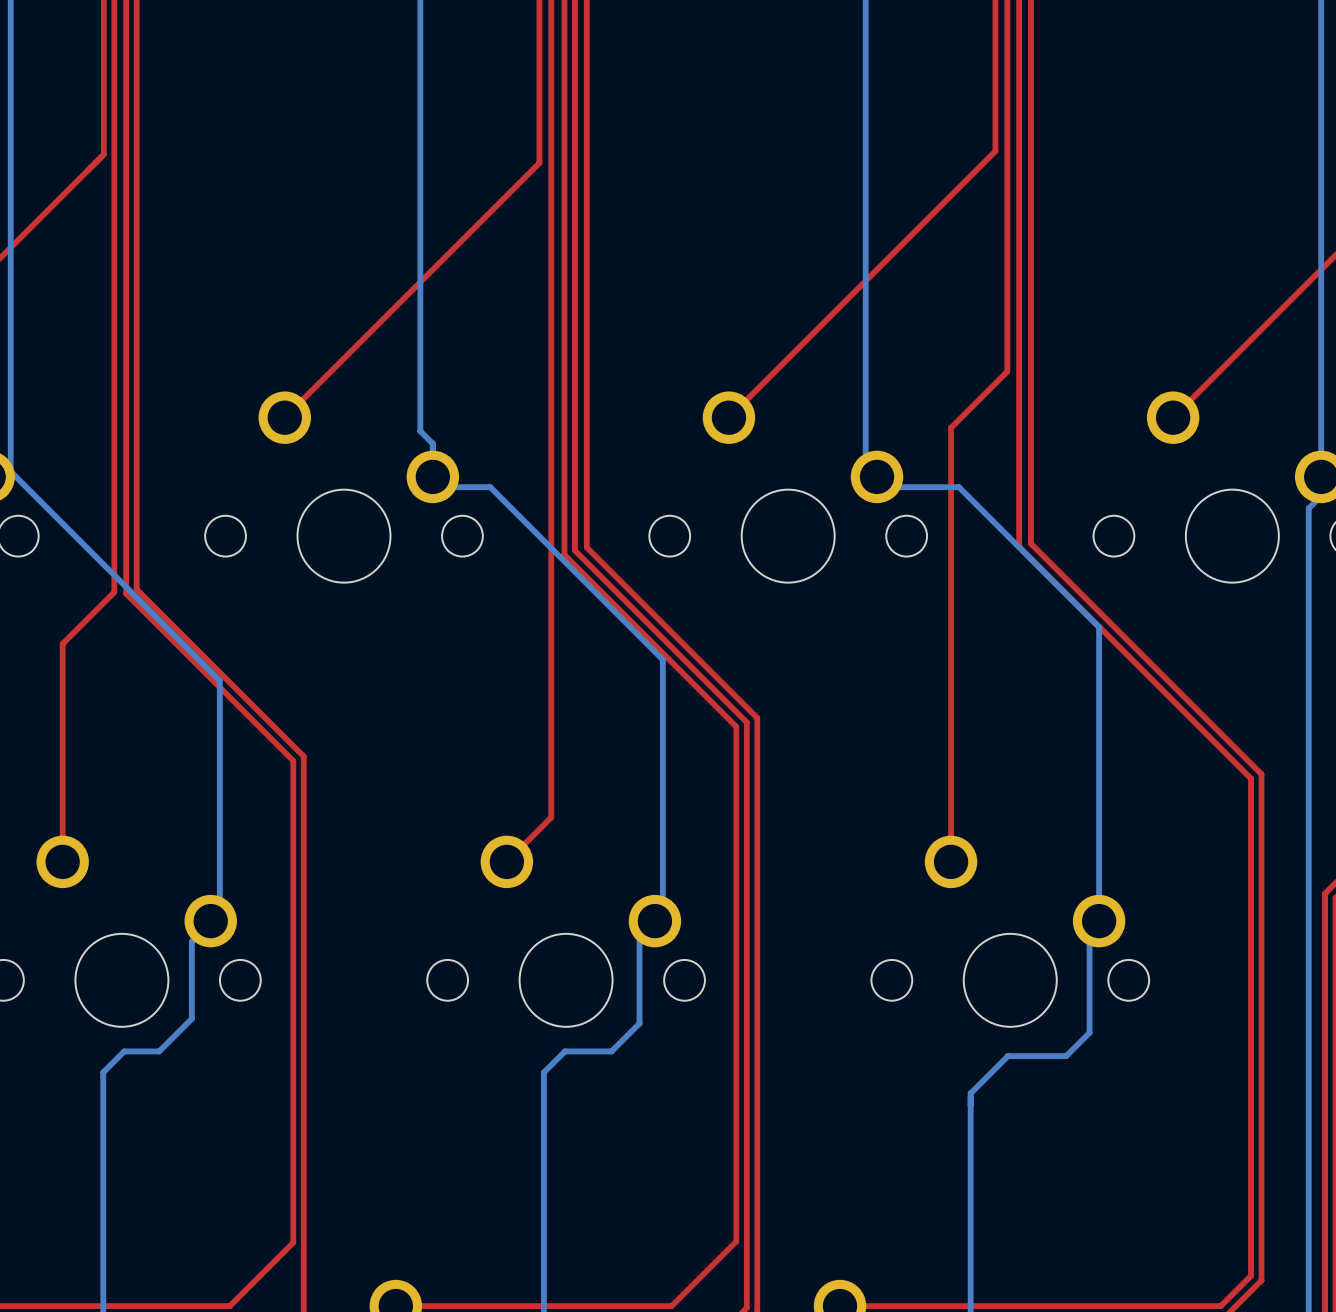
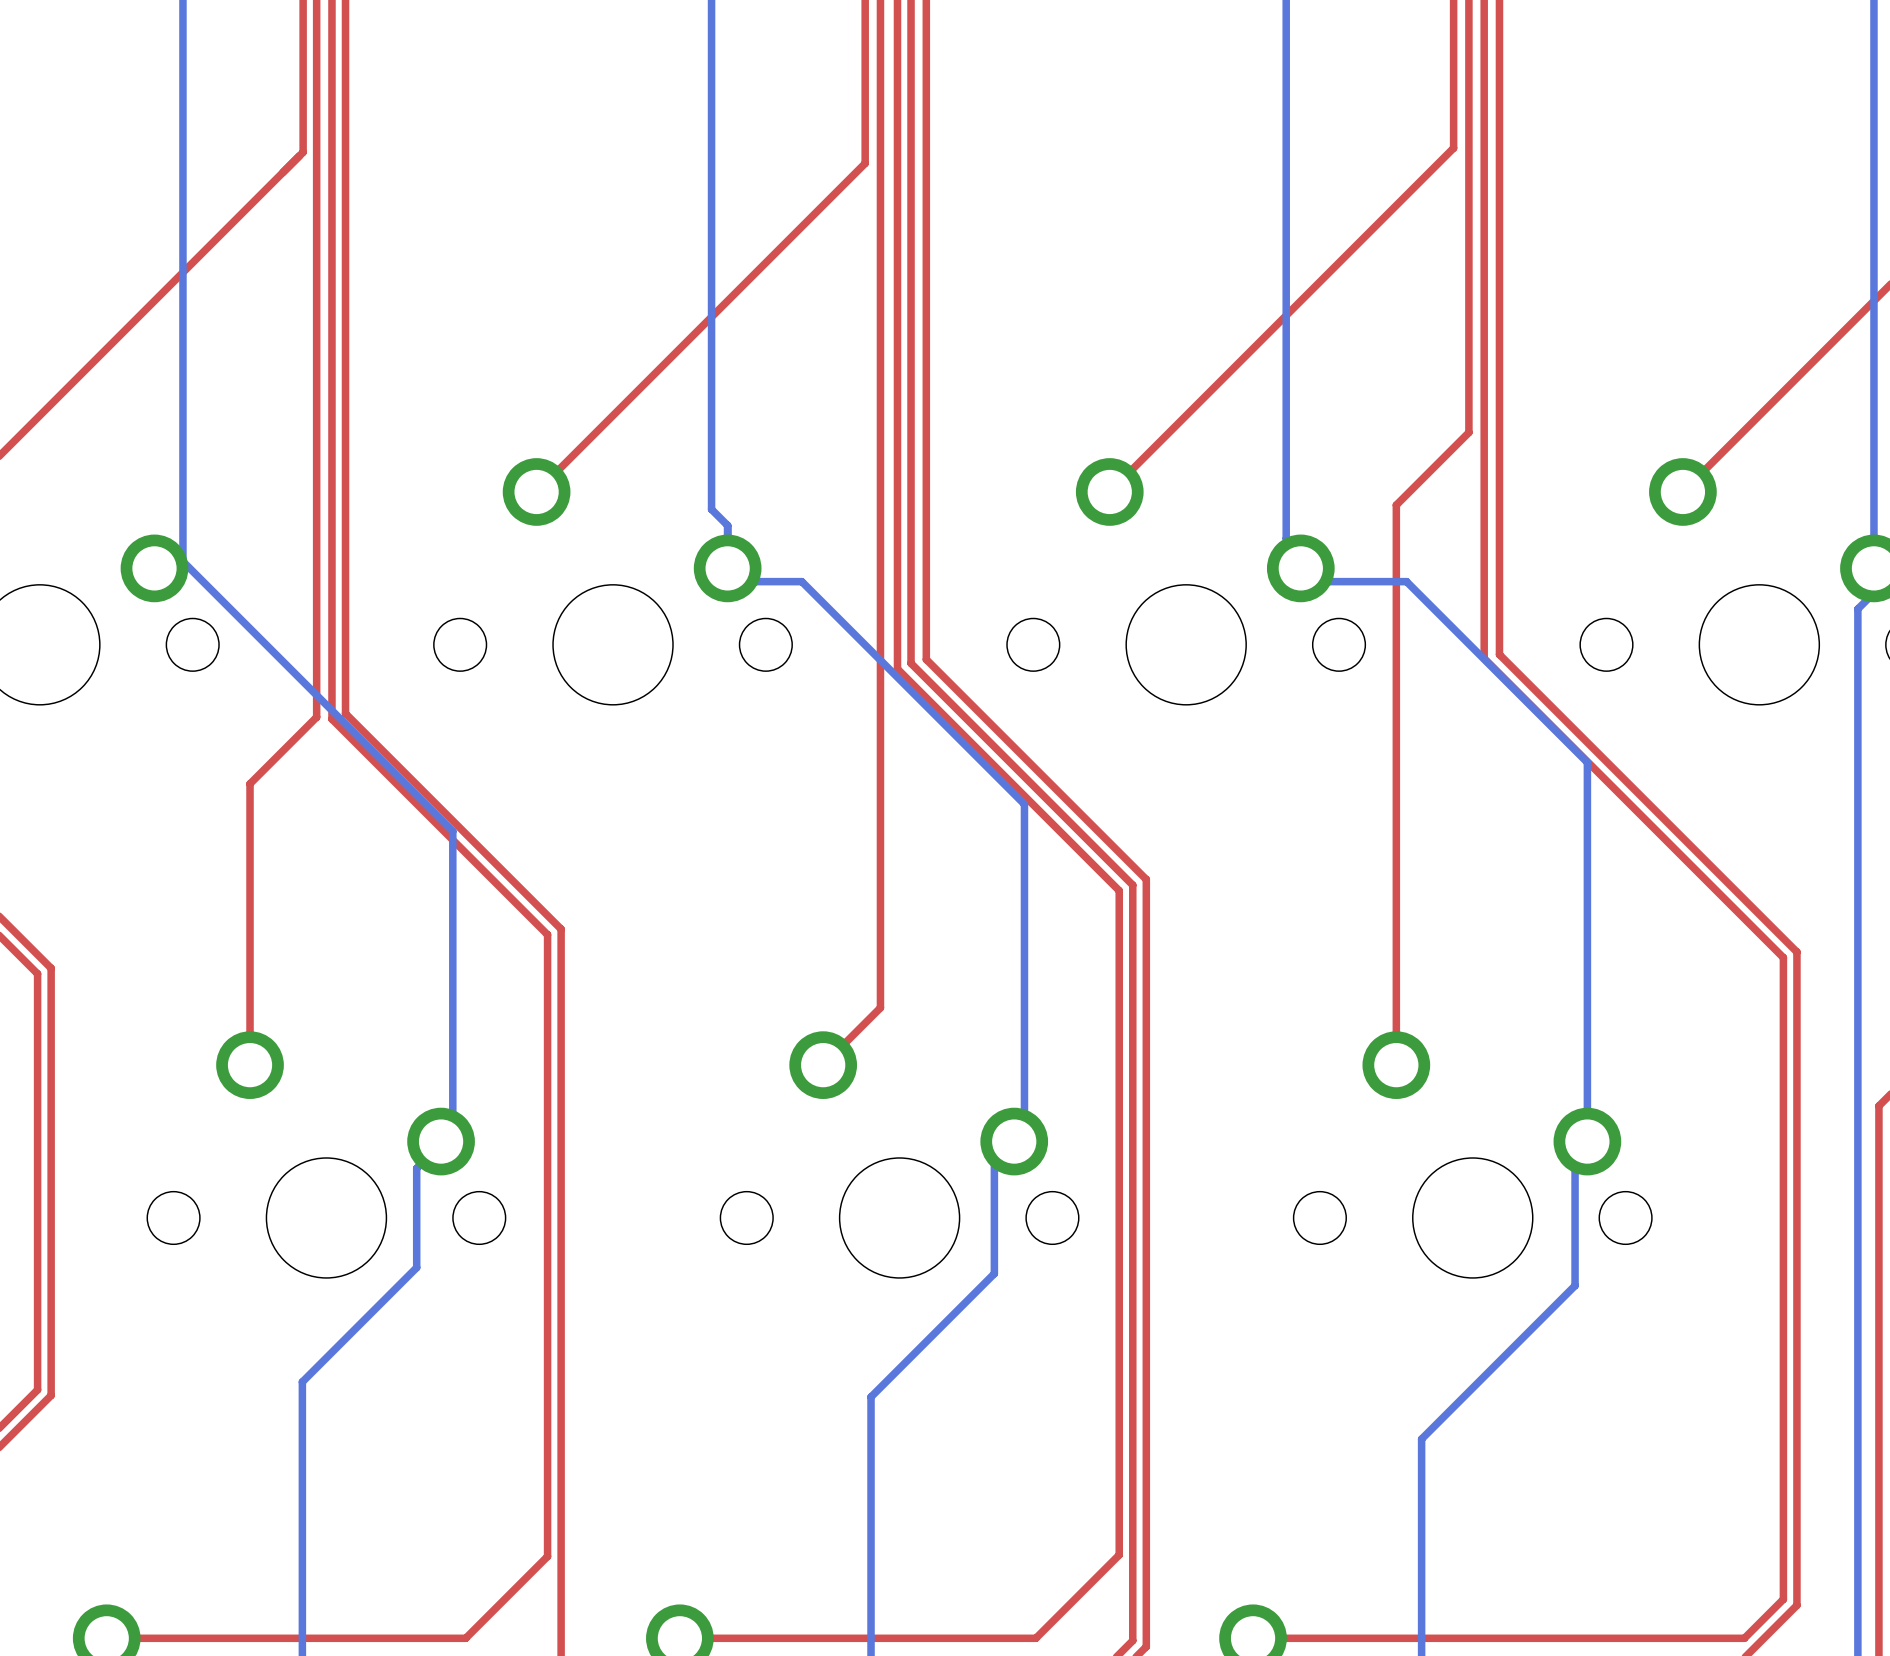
bottom track: (159, 1051) (124, 1051) (103, 1072) (103, 1076) -> (374, 1309) (302, 1381)
bottom track: (611, 1051) (564, 1051) (543, 1072) (543, 1119) -> (958, 1309) (871, 1397)
bottom track: (1066, 1056) (1007, 1056) (970, 1093) (970, 1151) -> (1544, 1315) (1421, 1439)
bottom track: (103, 1077) (103, 1107) -> none

